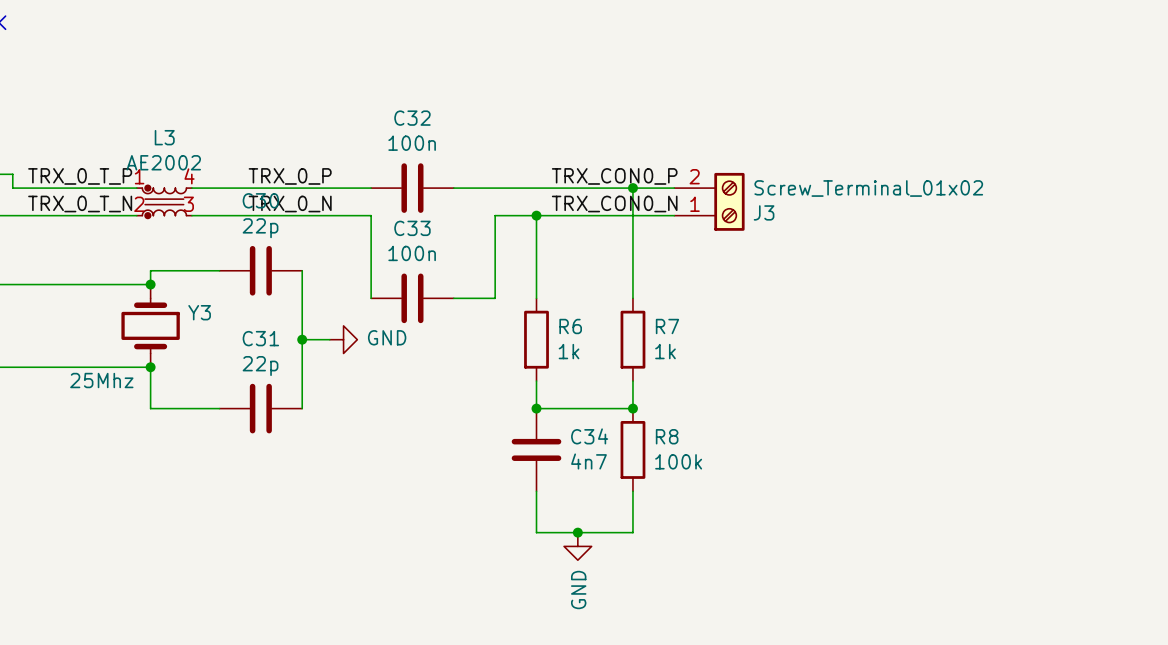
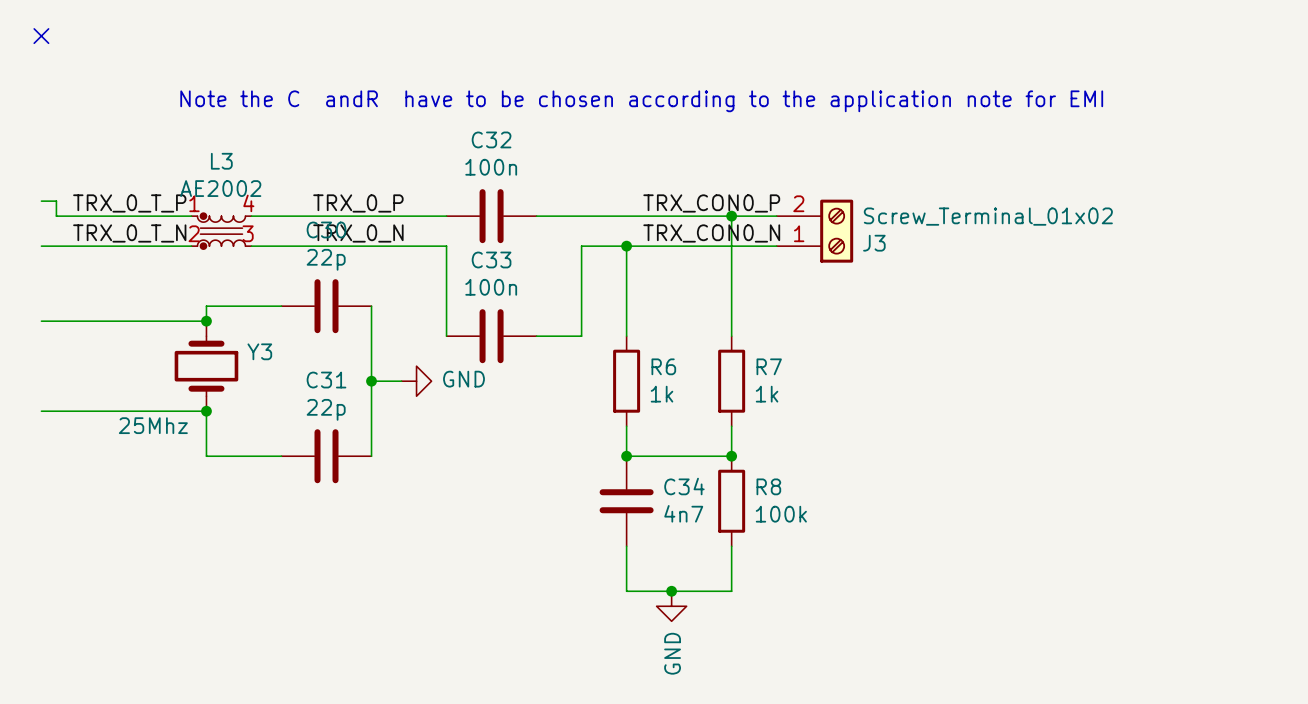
text: none -> Note the C andR have to be chosen according to the application note for EMI (641, 101)

